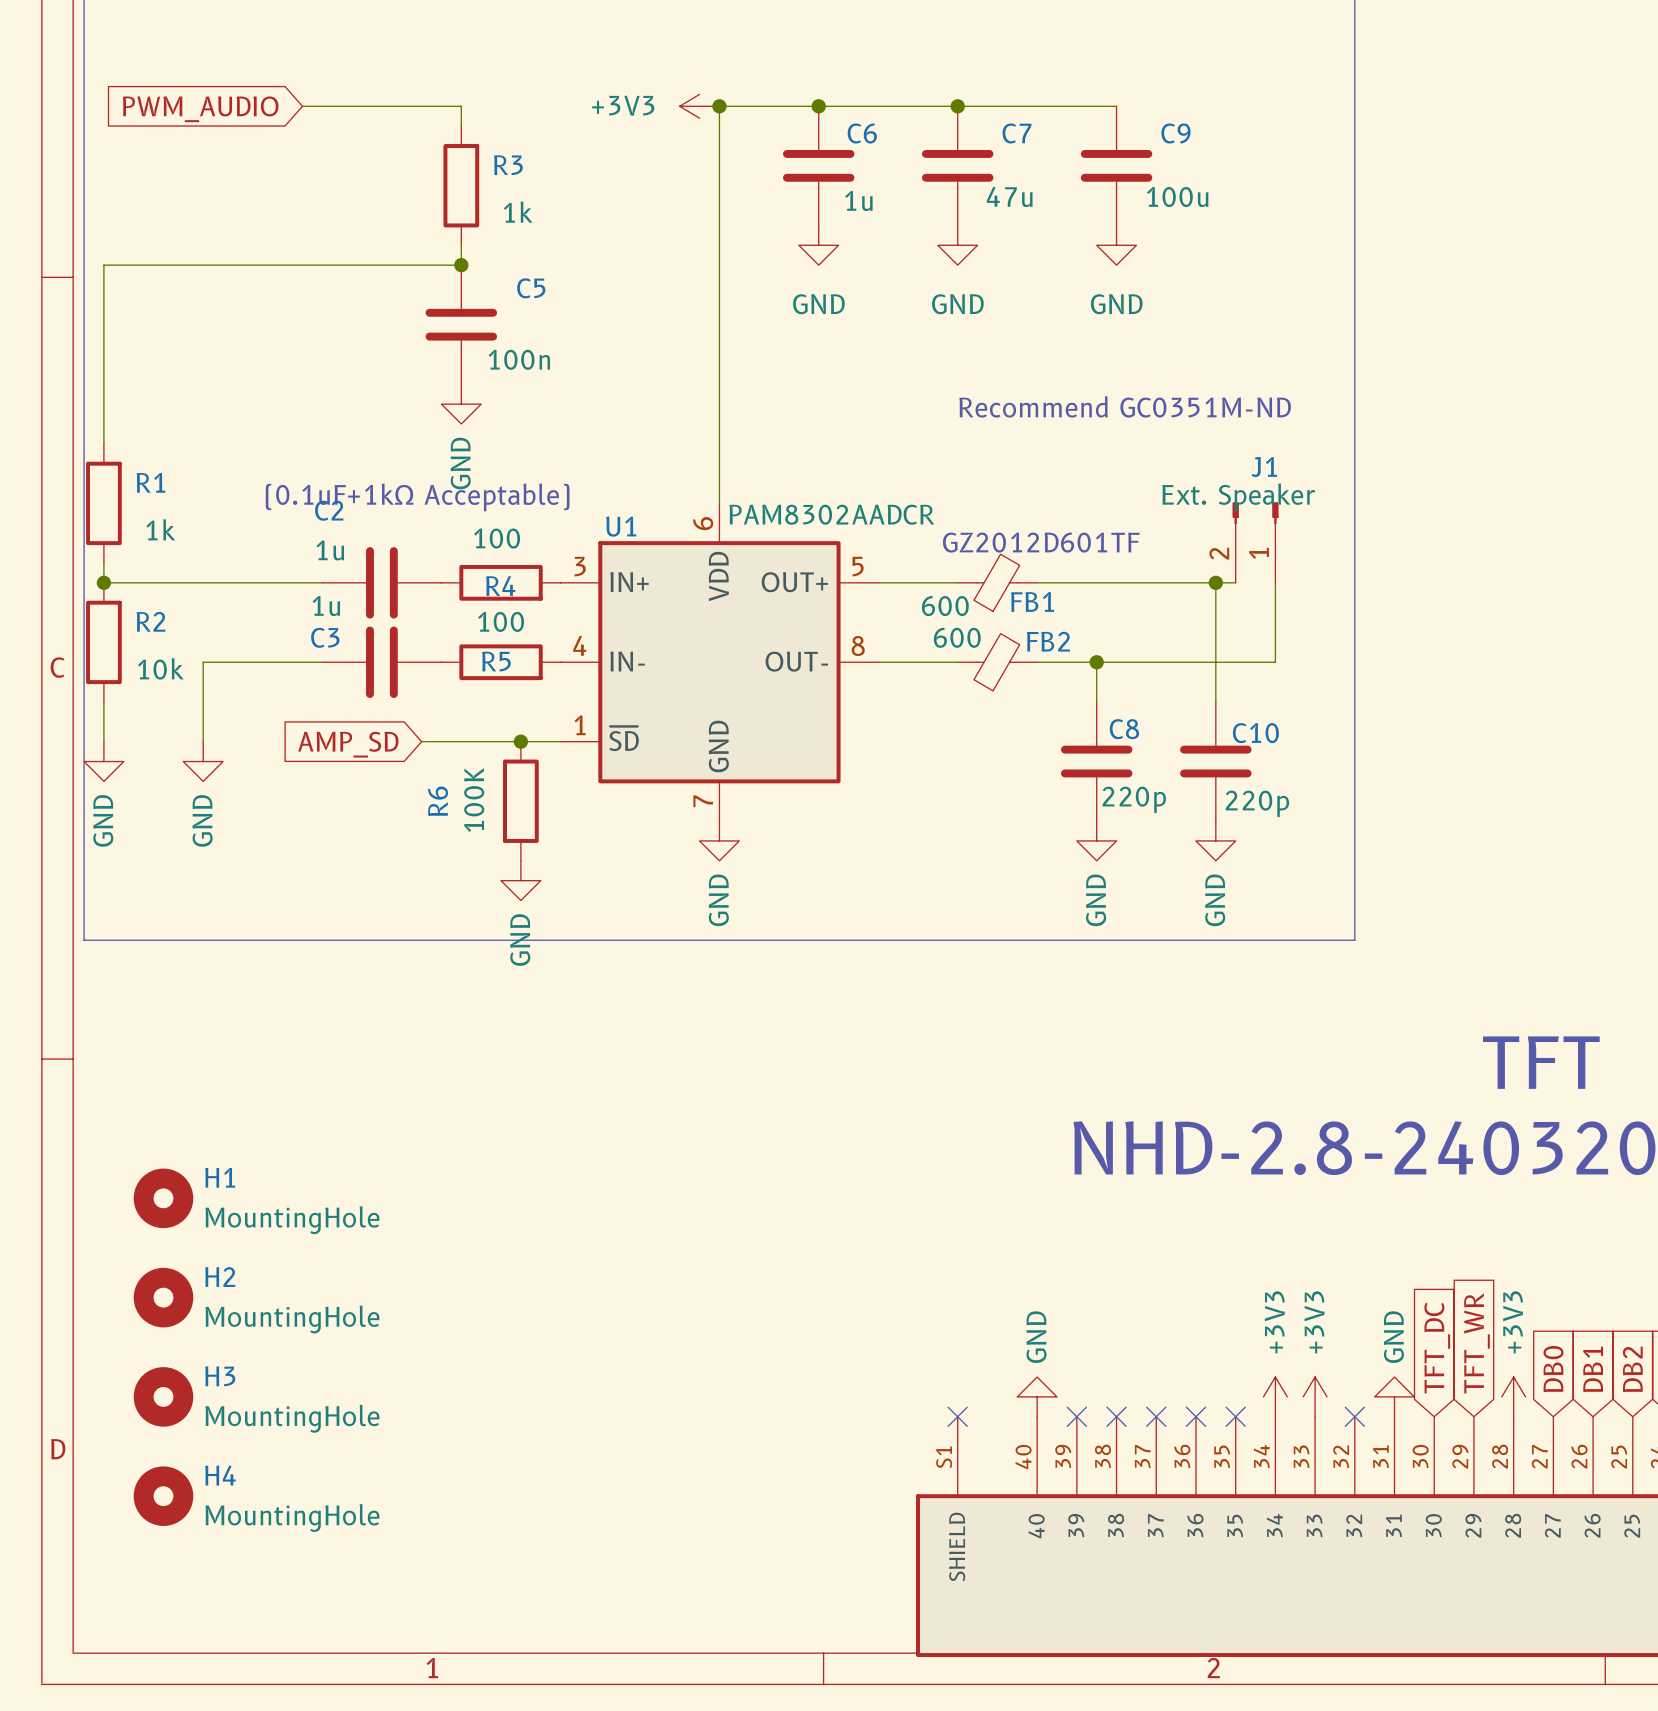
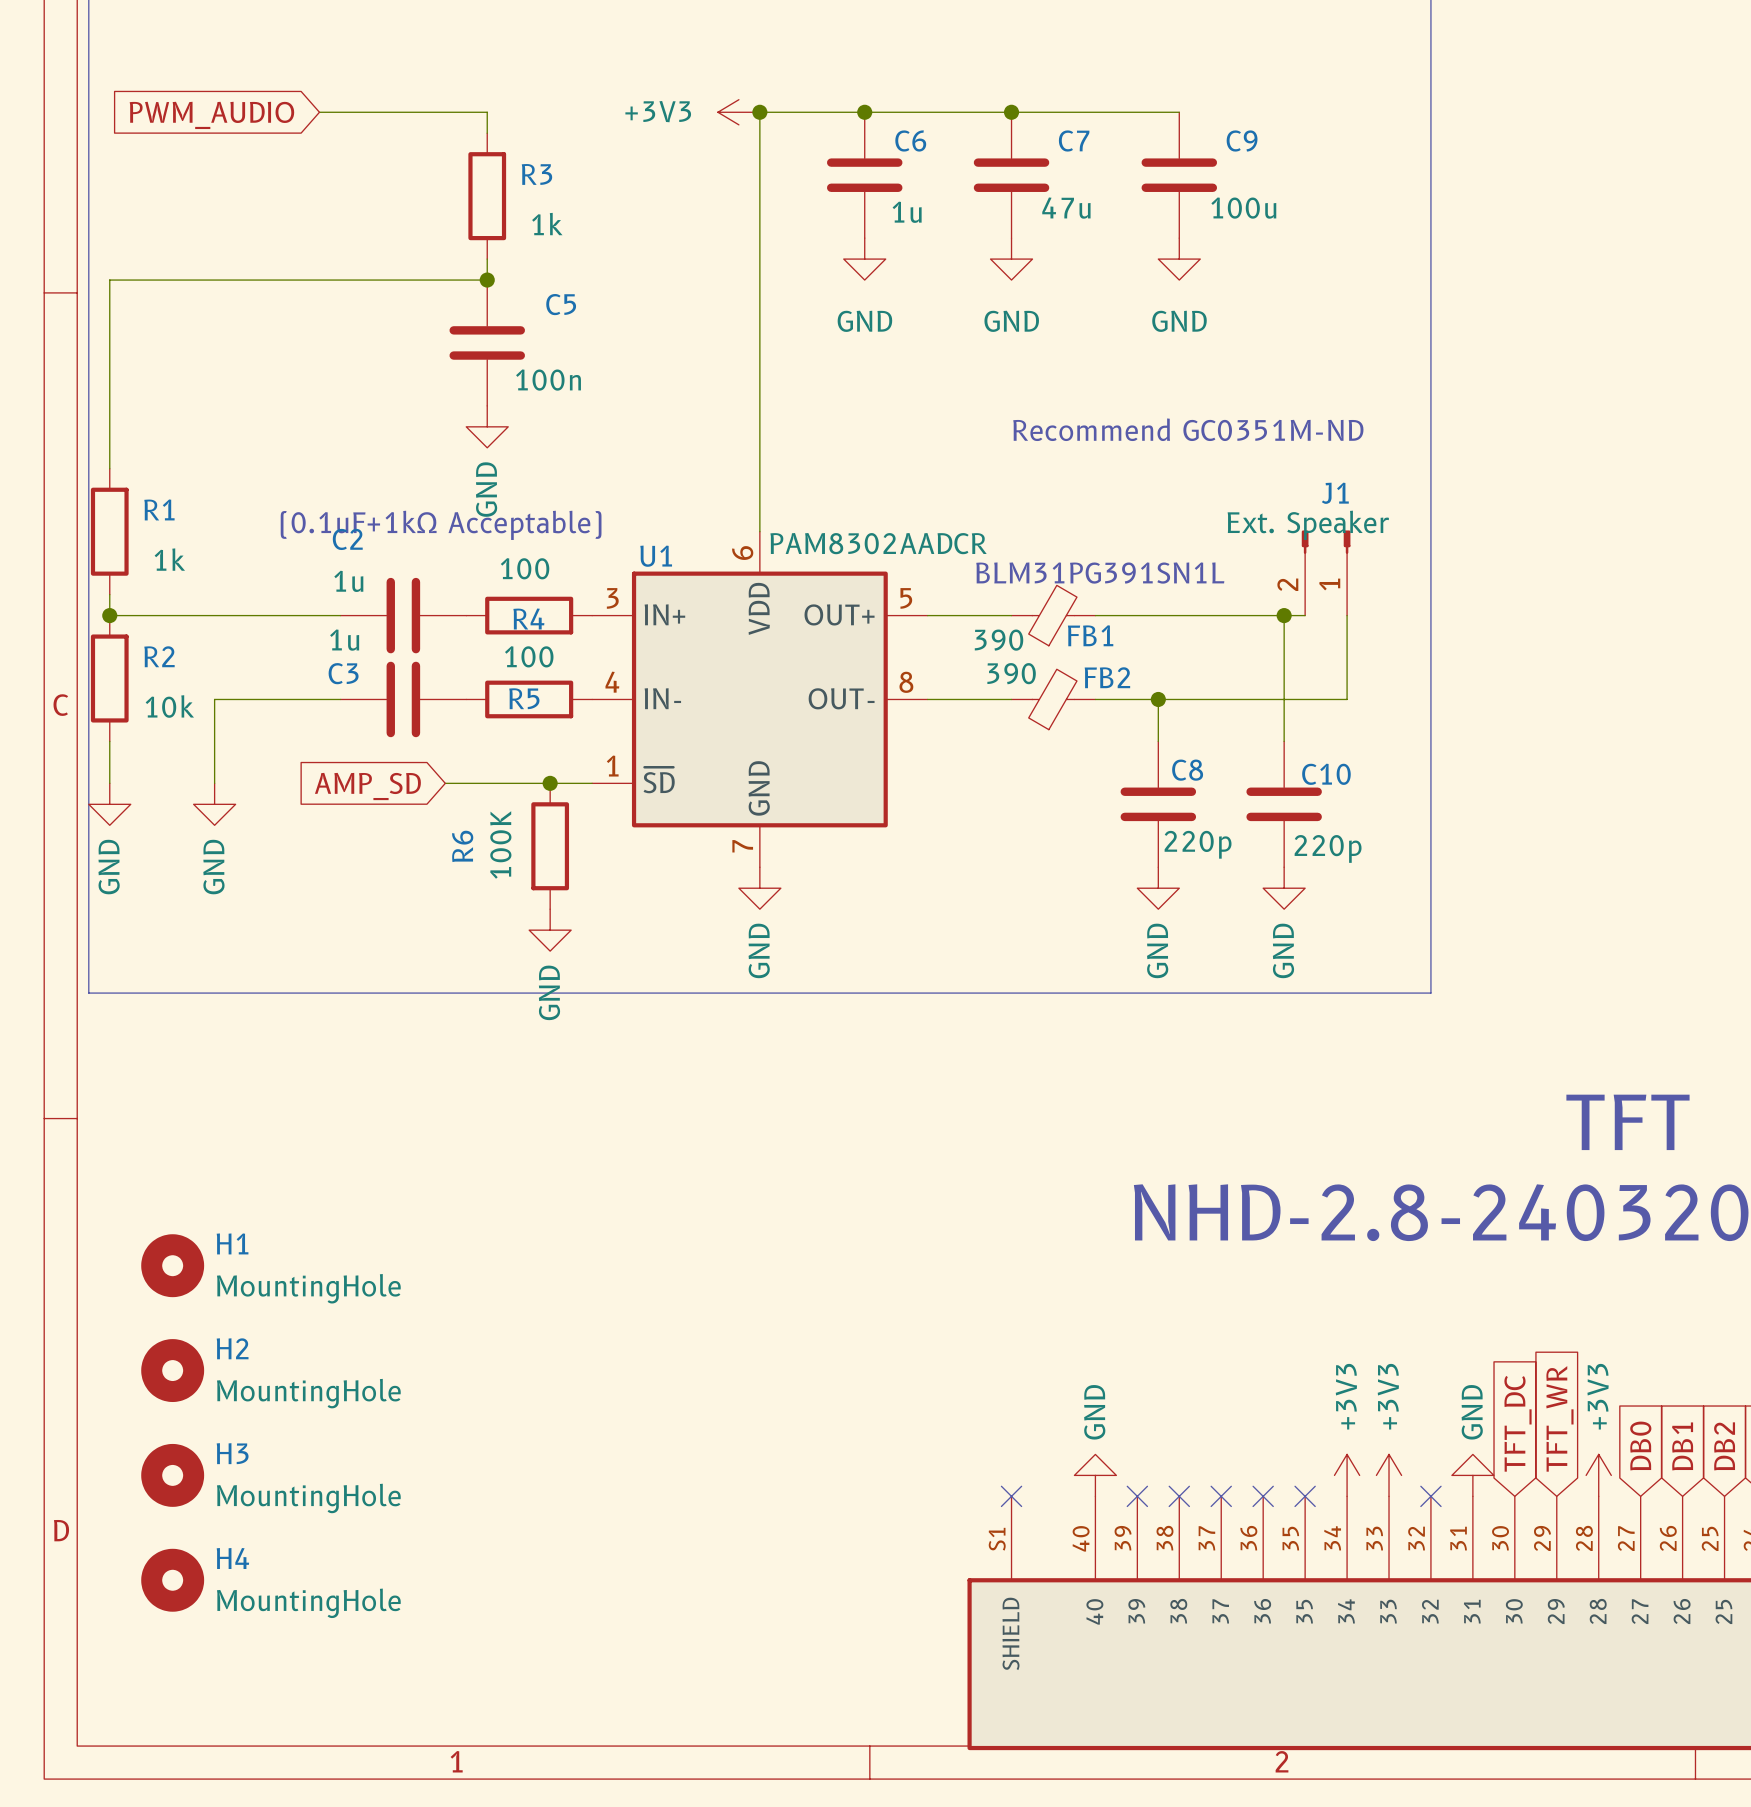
text: GZ2012D601TF (1041, 542) -> BLM31PG391SN1L (1100, 573)
FB1 value: 600 (945, 606) -> 390 (999, 640)
FB2 value: 600 (957, 637) -> 390 (1011, 673)

